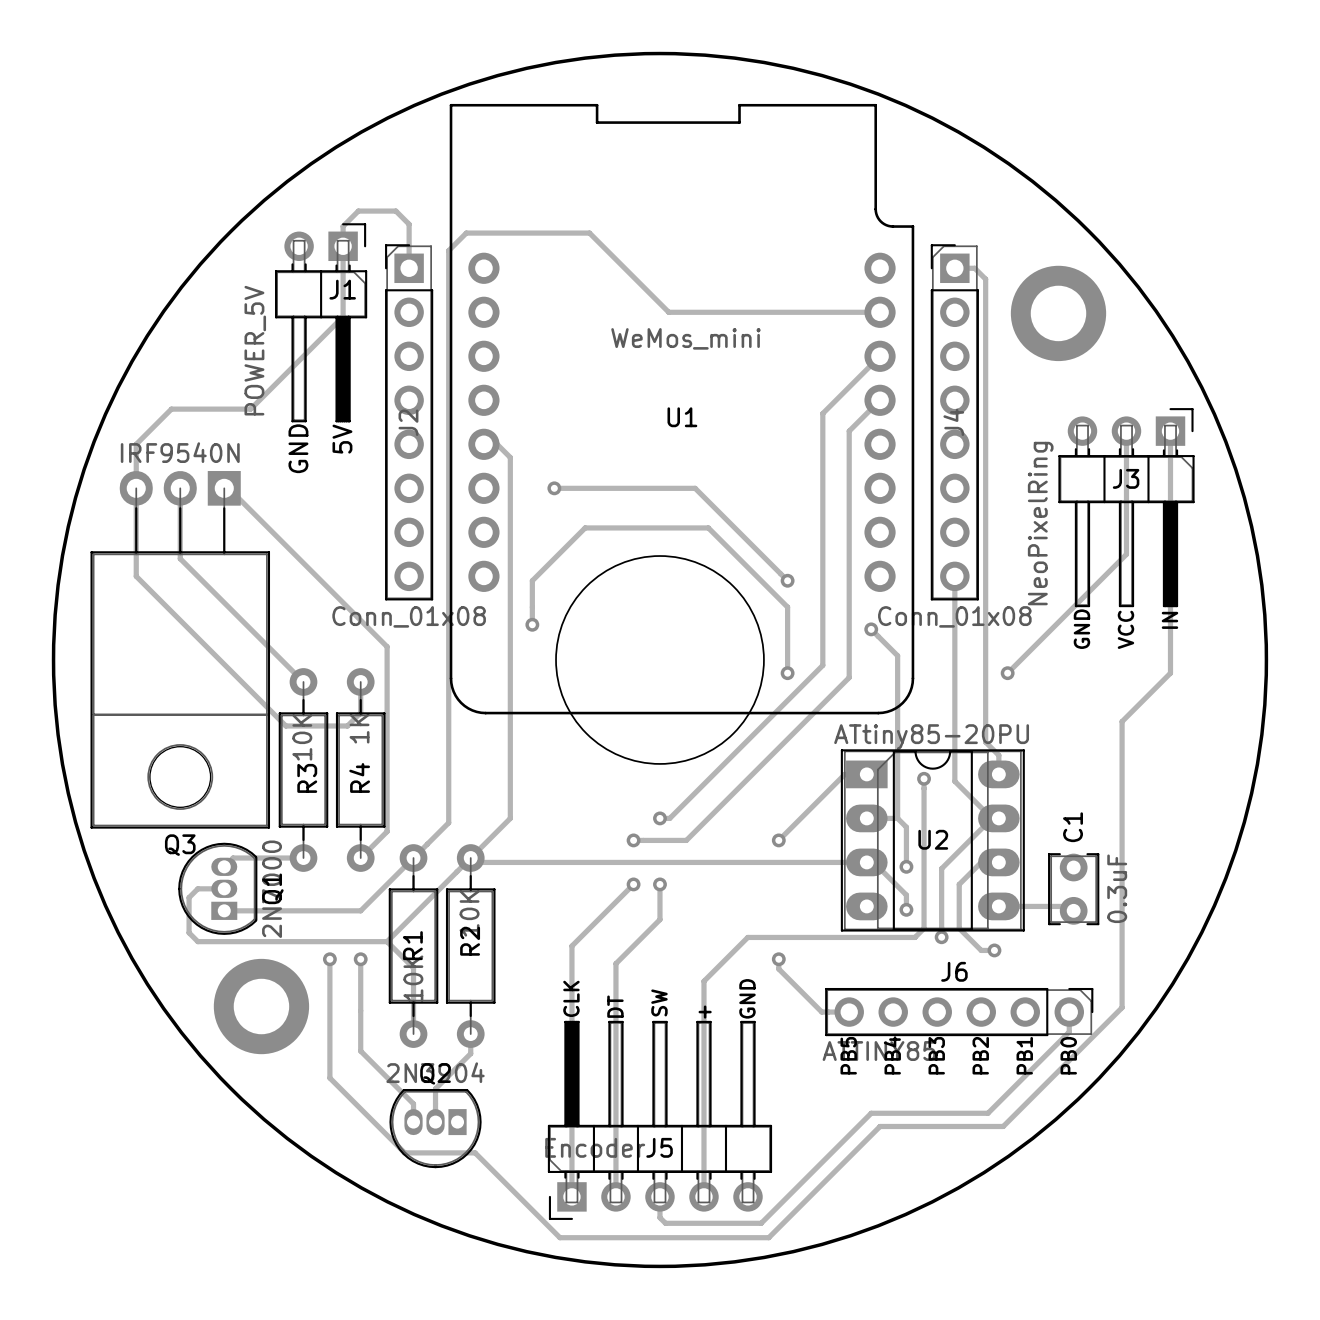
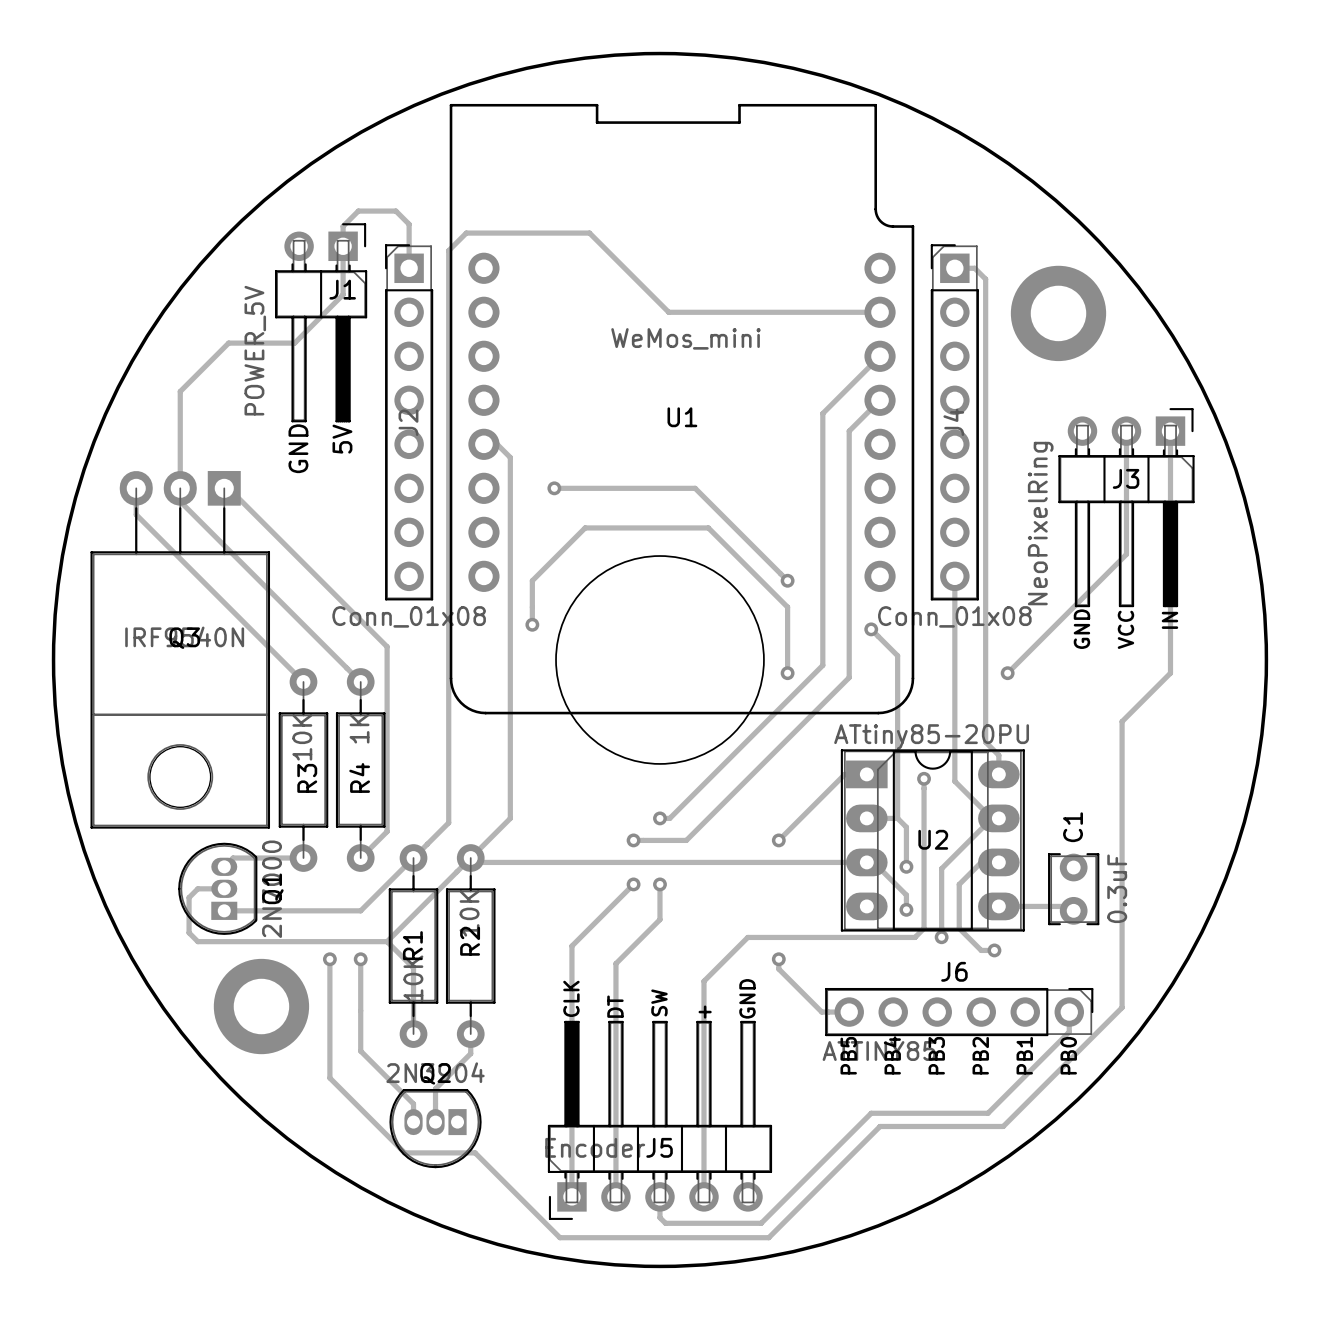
track: (343, 294) (343, 316) (250, 409) (171, 409) (136, 444) (136, 488) -> (343, 294) (294, 343) (228, 343) (180, 391) (180, 488)
Q3 value position: IRF9540N (180, 452) -> IRF9540N (184, 636)
track: (180, 501) (180, 558) -> (136, 514) (180, 558)
track: (136, 514) (136, 576) (285, 725) (347, 725) (360, 712) (360, 681) -> (180, 501) (360, 681)
Q3 name position: Q3 (180, 845) -> Q3 (184, 638)

